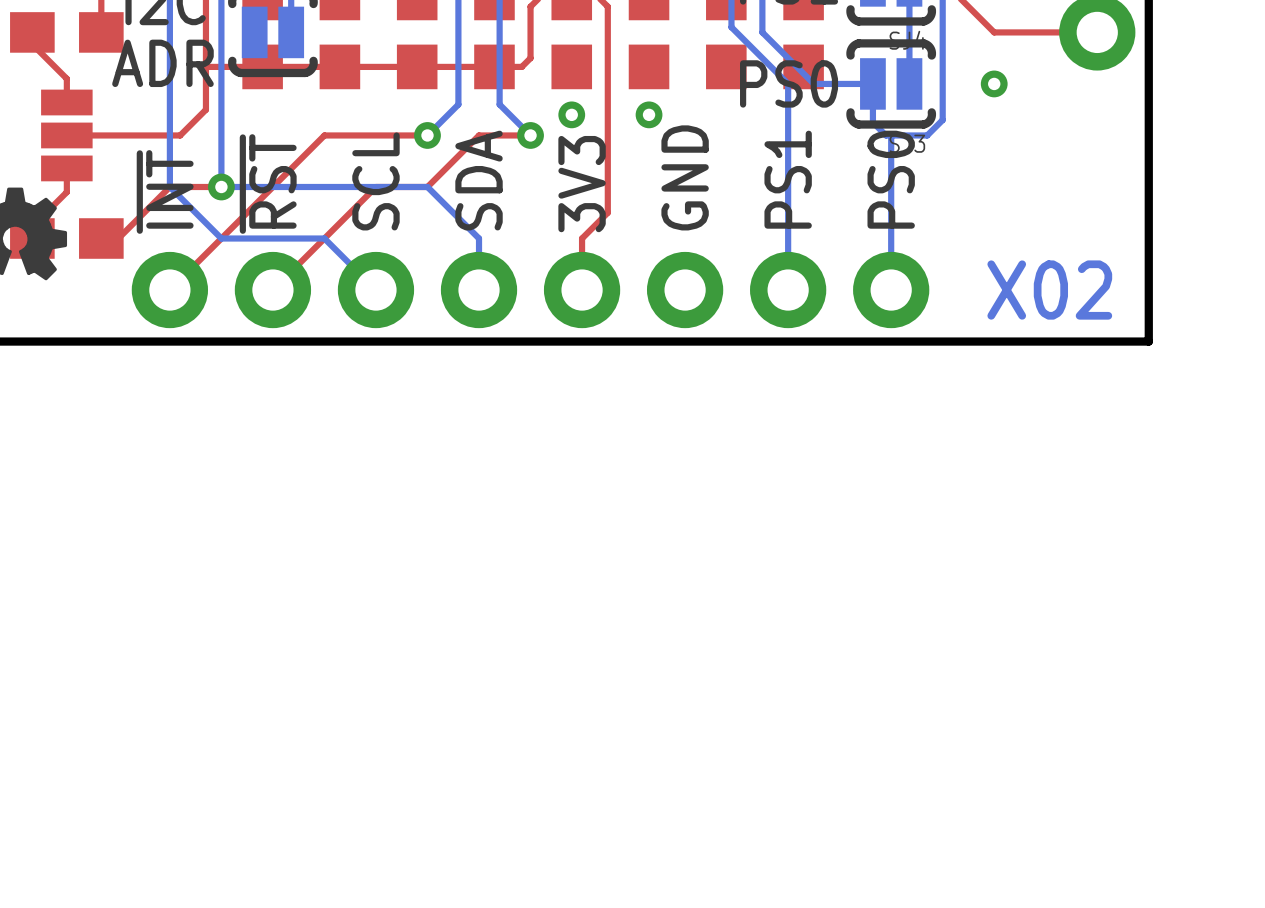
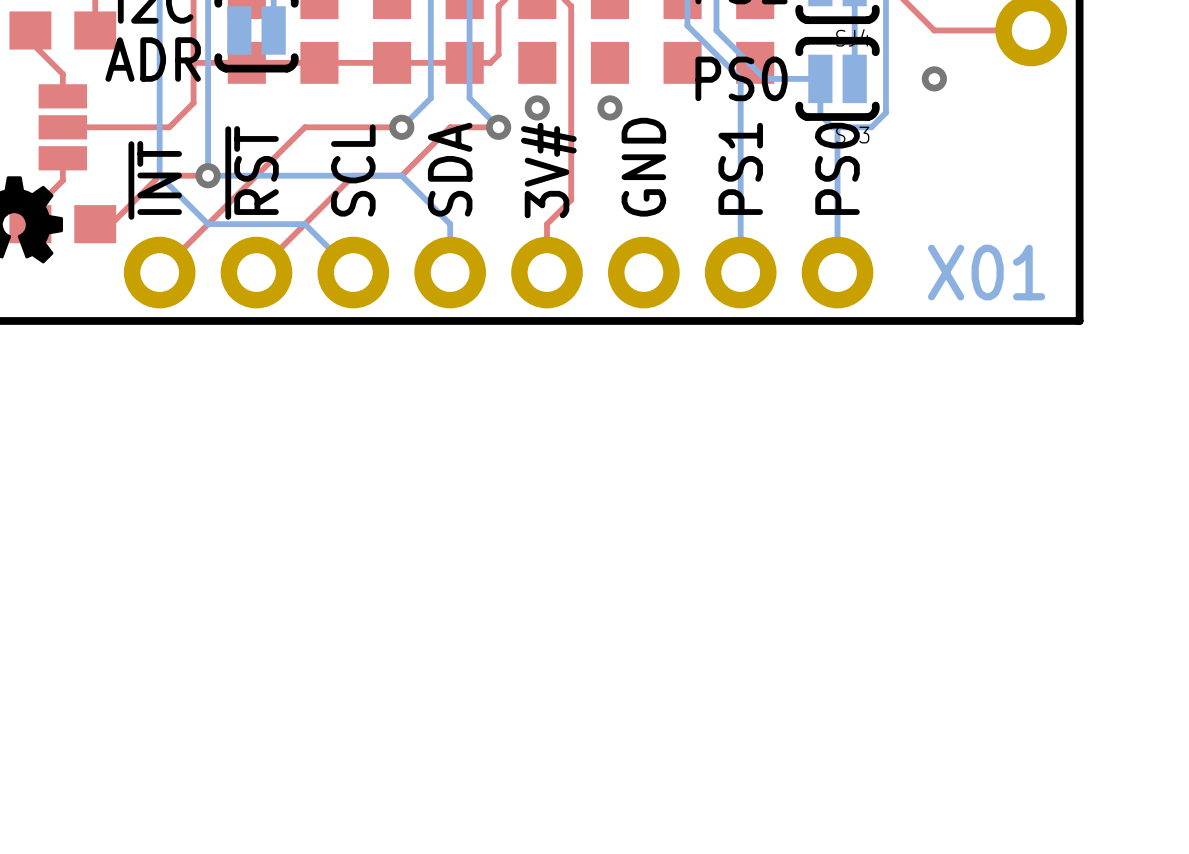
text: 3V3 (582, 184) -> 3V# (548, 170)
text: X02 (1049, 290) -> X01 (986, 272)

